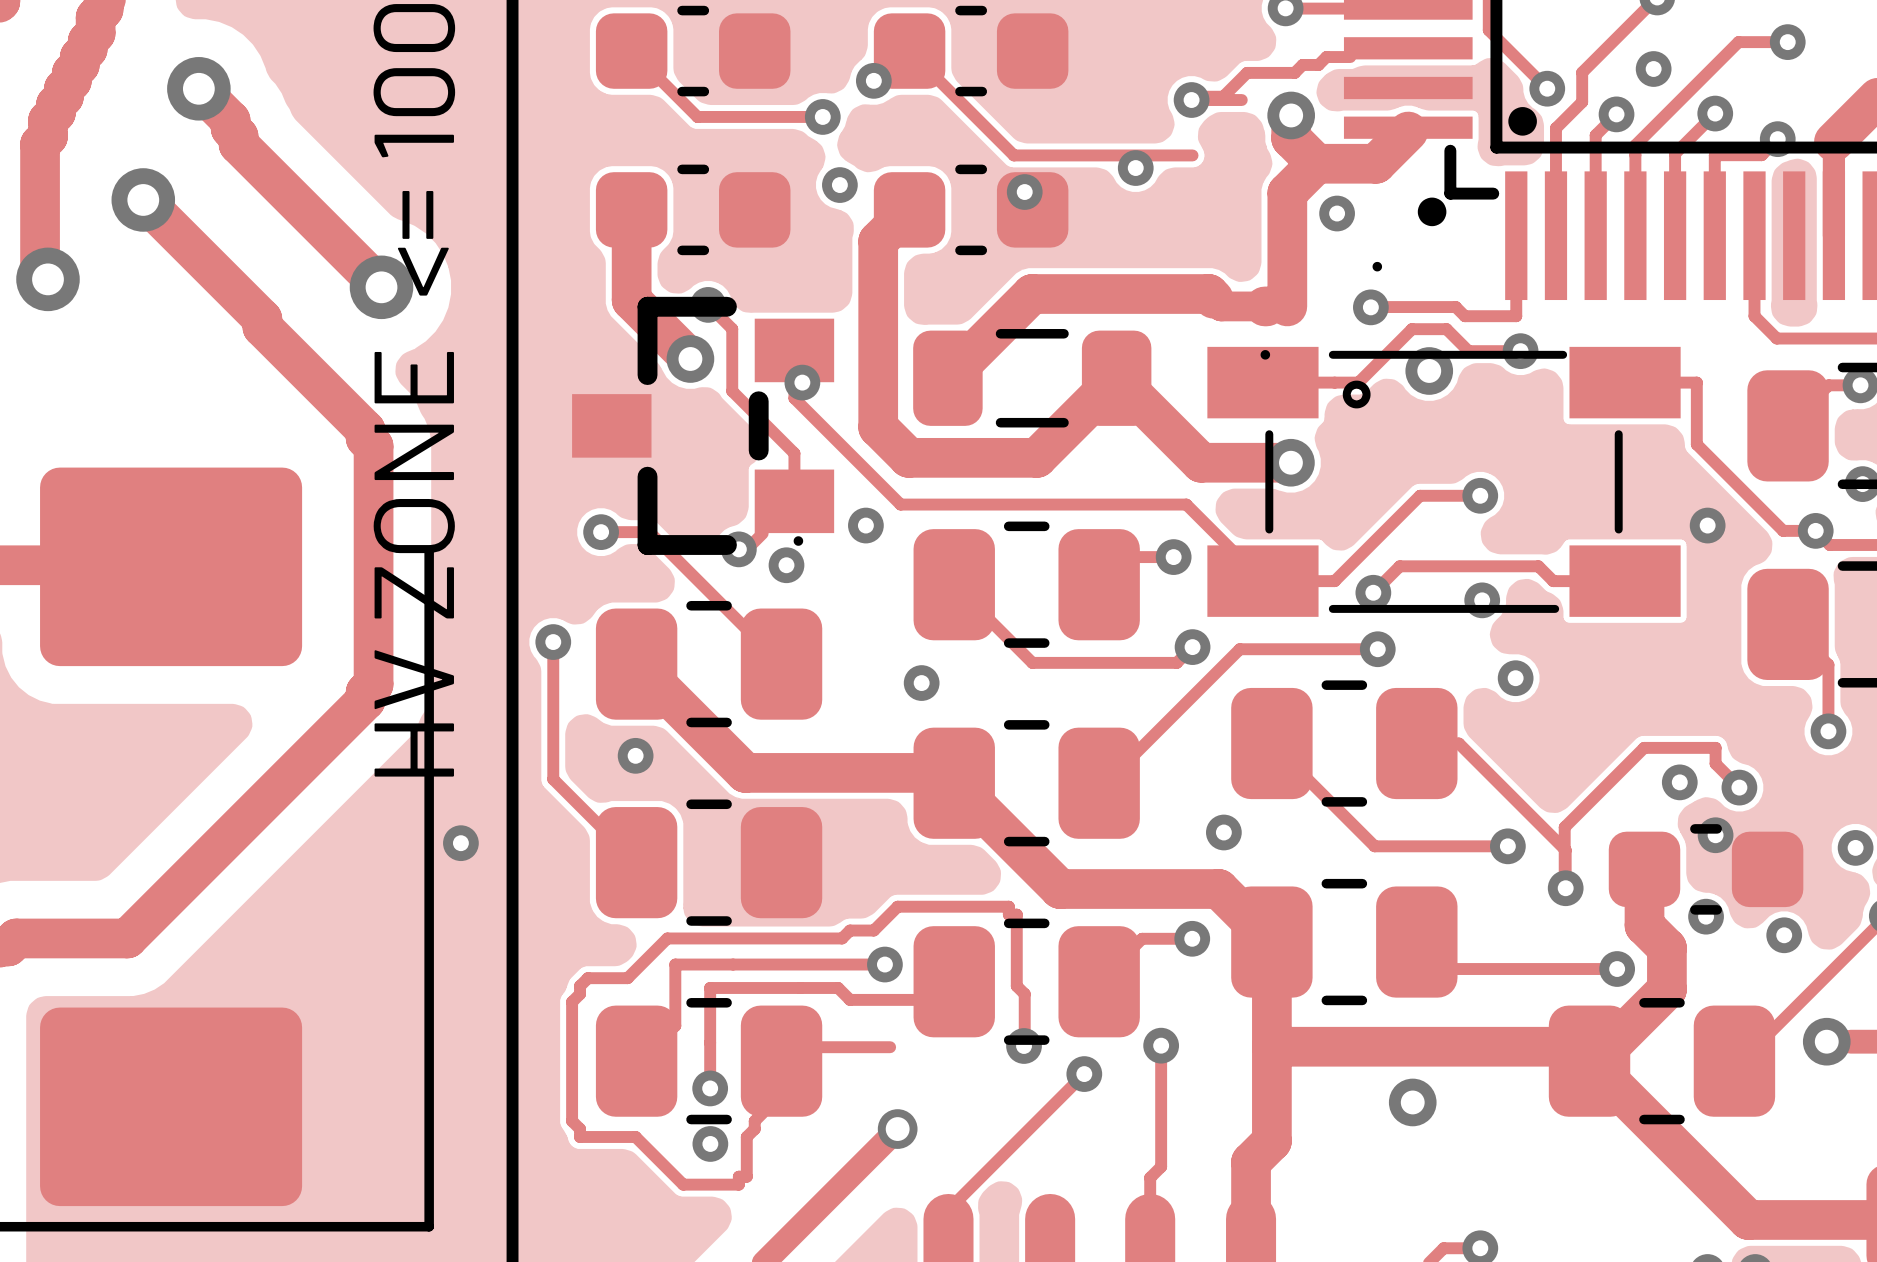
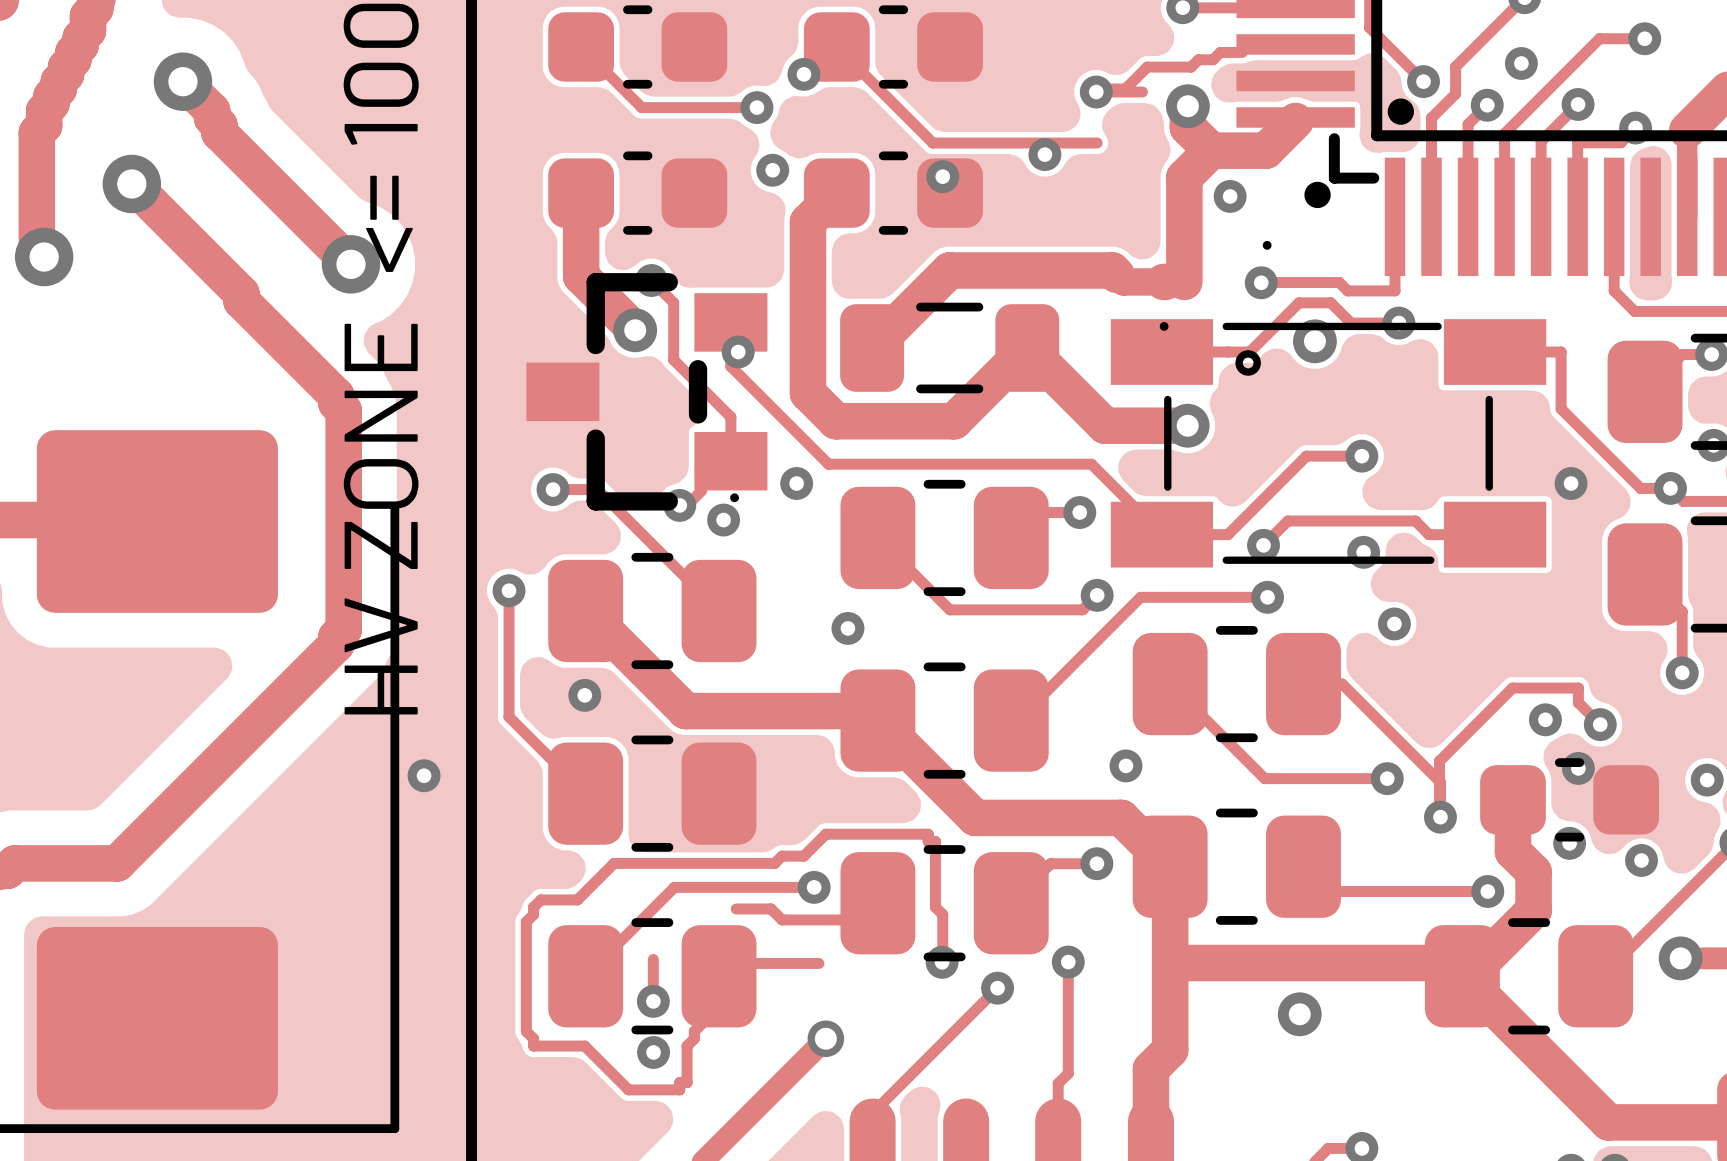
track: (733, 964) (675, 964) (675, 1025) (636, 1061) -> (674, 887) (585, 976)
track: (800, 987) (710, 987) (710, 1042) -> none

